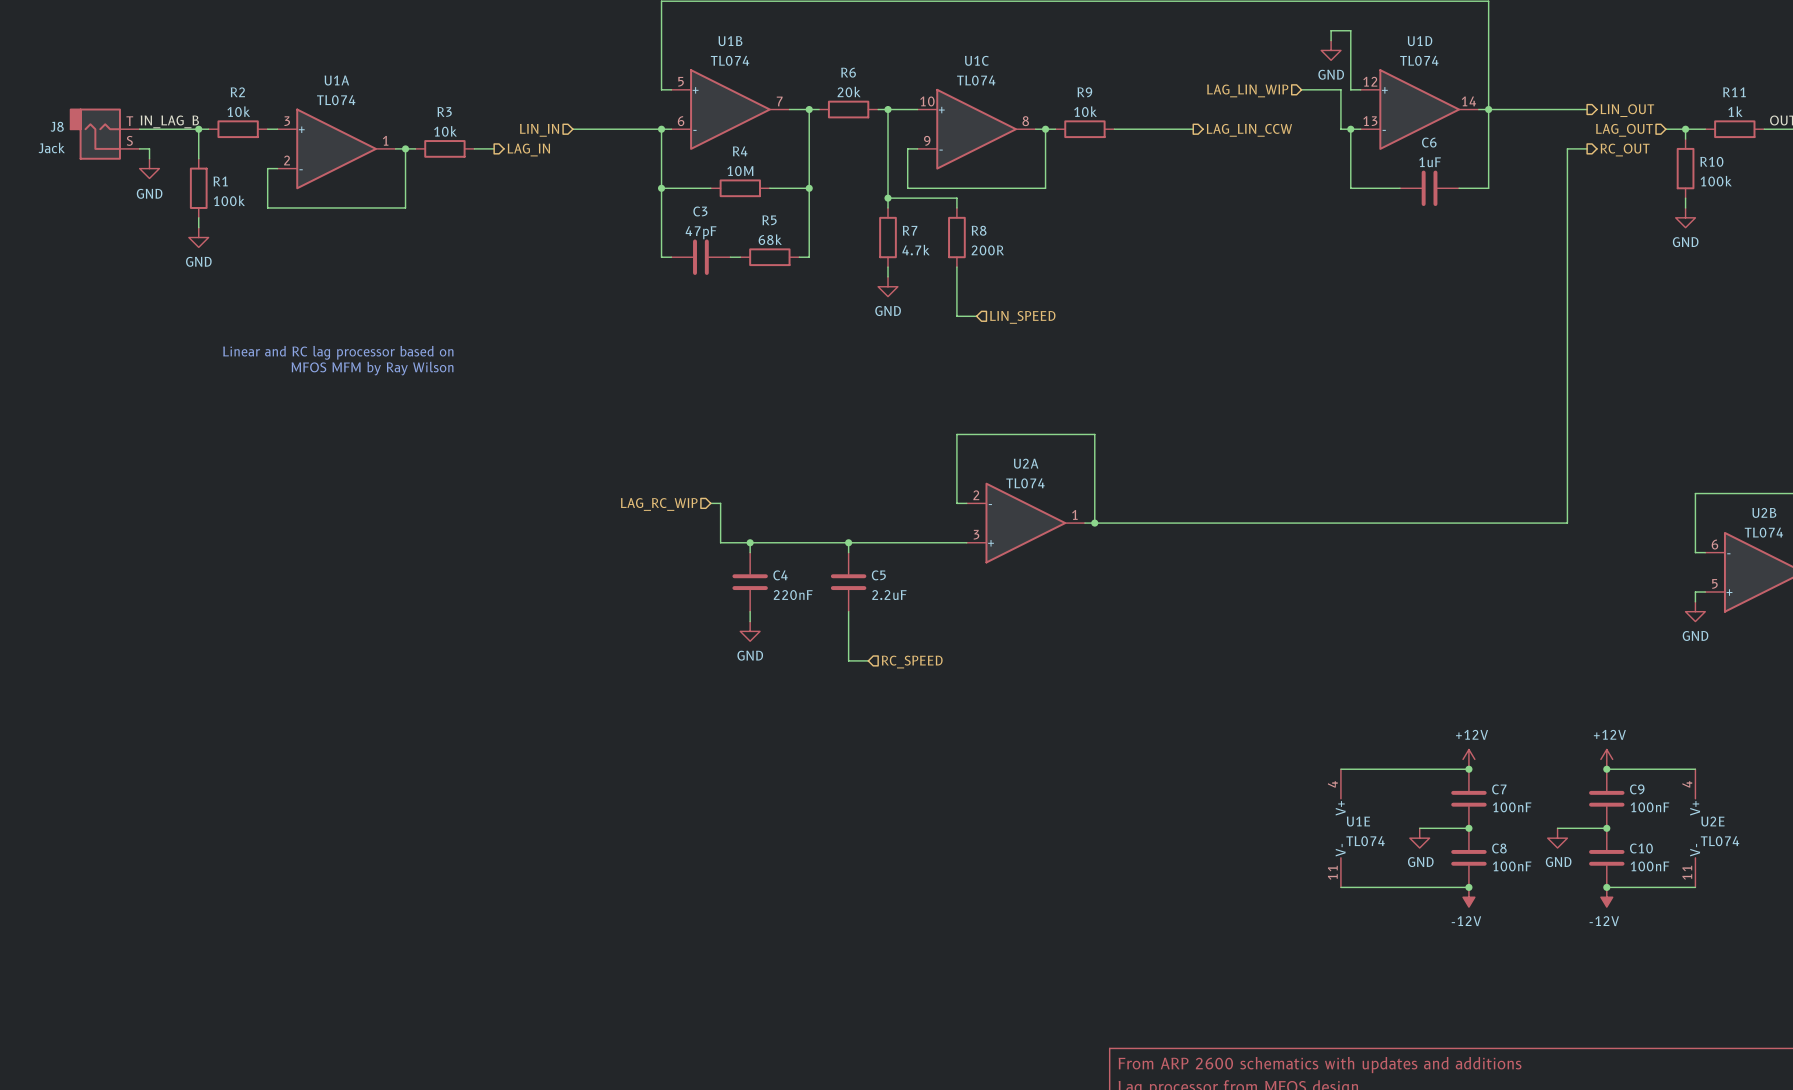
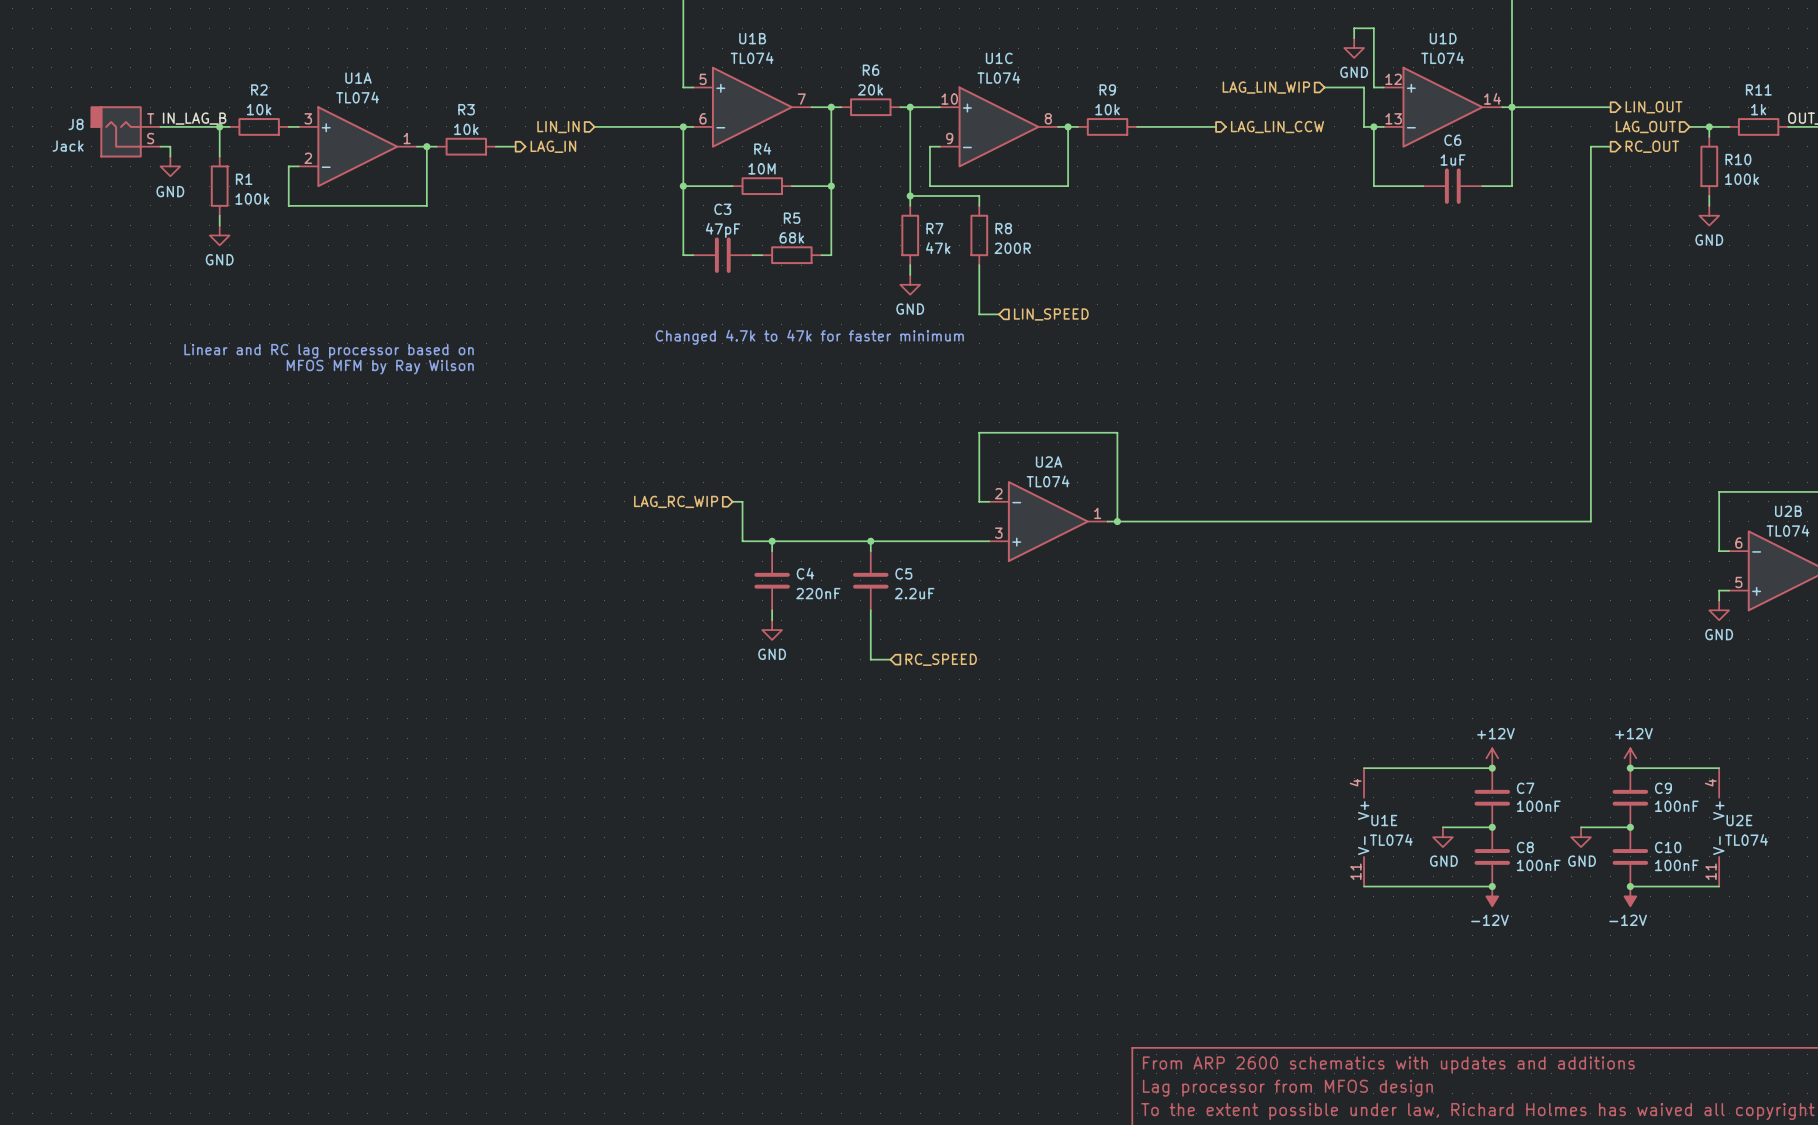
R7 value: 4.7k (916, 250) -> 47k (938, 248)
text: none -> Changed 4.7k to 47k for faster minimum (809, 337)

